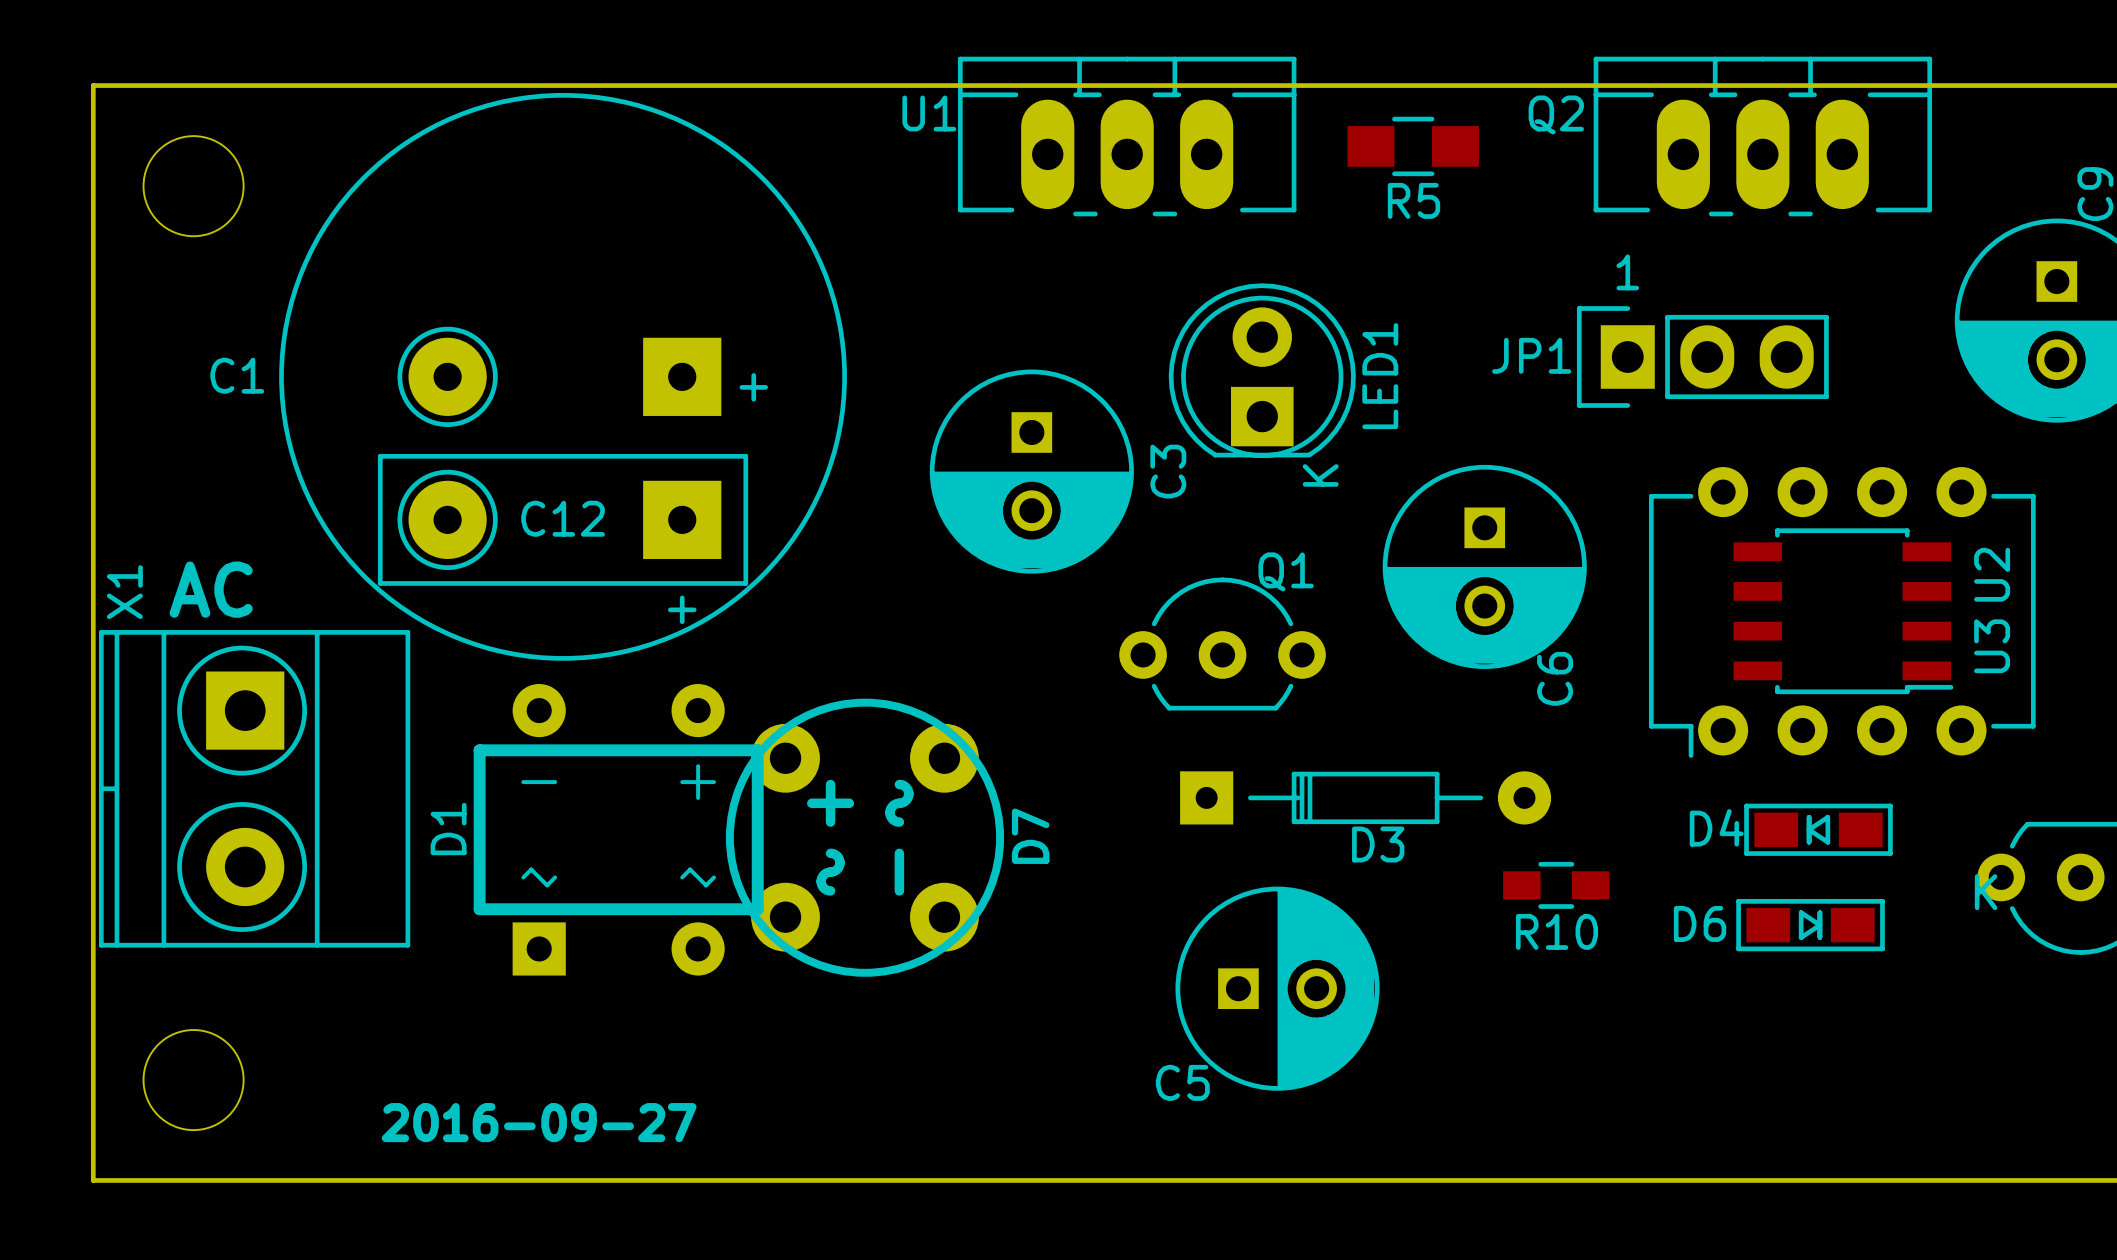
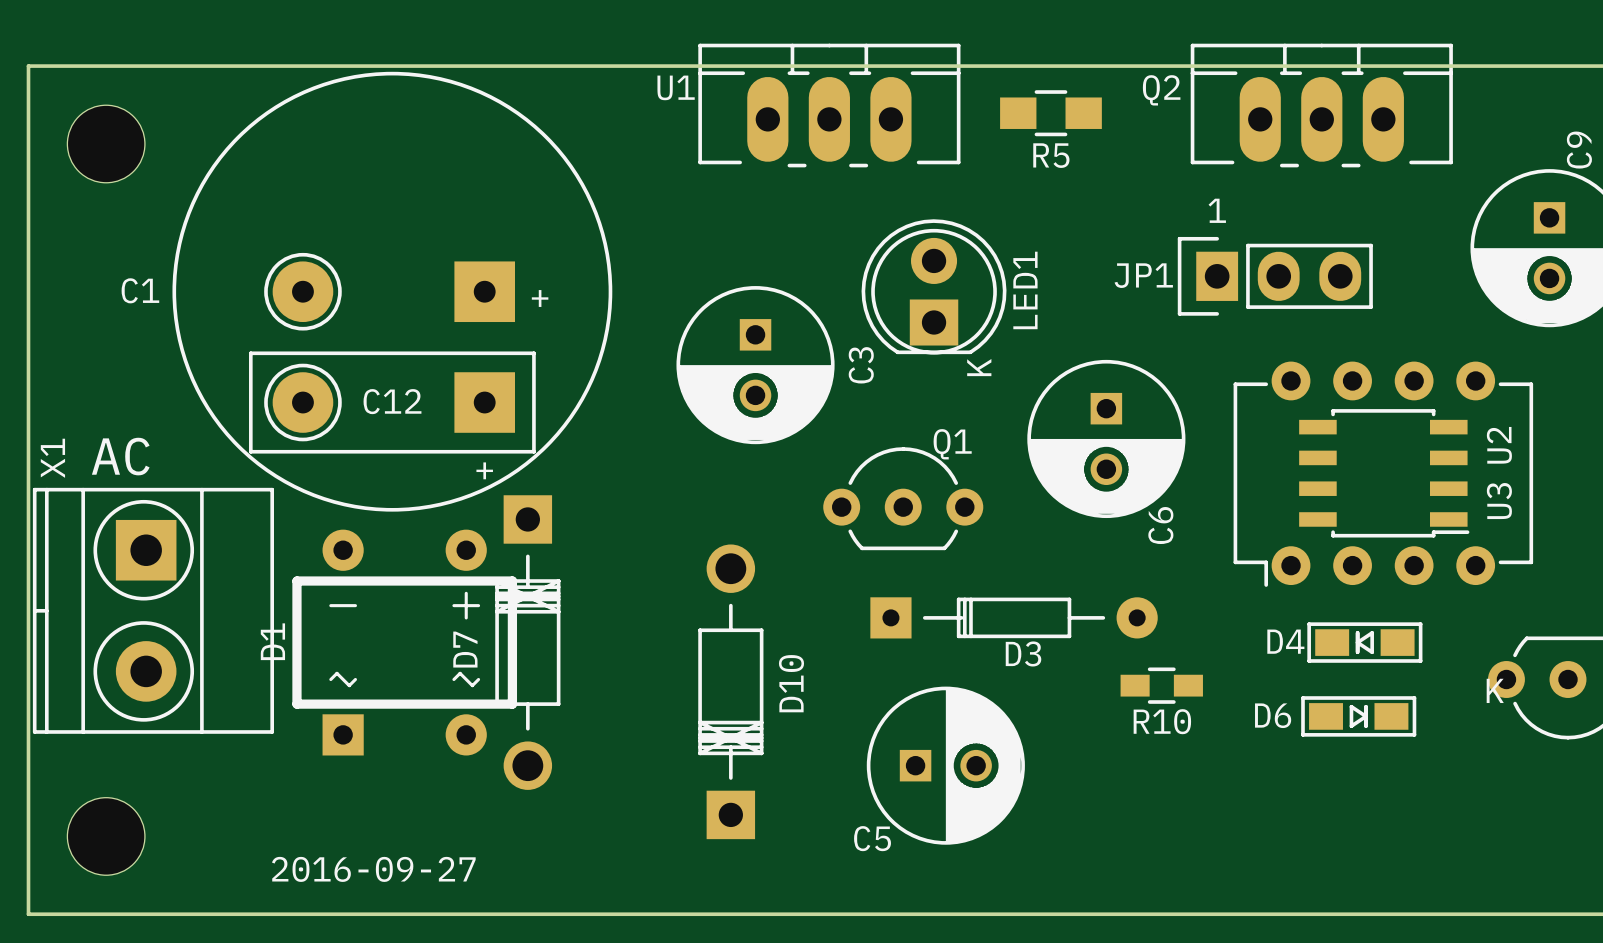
D7 footprint: [725, 698, 1005, 977] -> [495, 495, 561, 790]
D1 position: (618, 829) -> (404, 642)
D7 name position: D7 (1030, 836) -> D7 (465, 649)
D10: none -> (730, 691)

